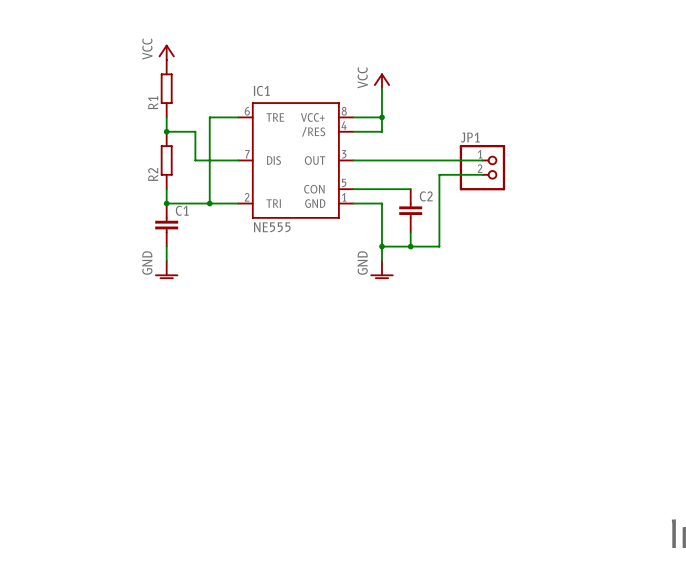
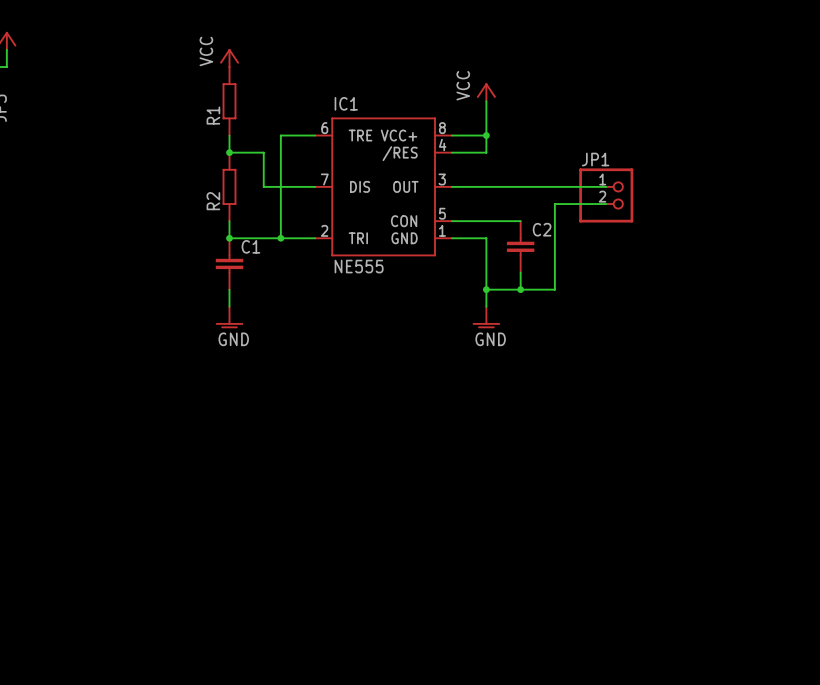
power symbol text rotation: 0° (147, 263) -> 90° clockwise (233, 339)
power symbol text position: GND (147, 263) -> GND (233, 339)
power symbol text rotation: 0° (362, 263) -> 90° clockwise (490, 339)
power symbol text position: GND (362, 263) -> GND (490, 339)

